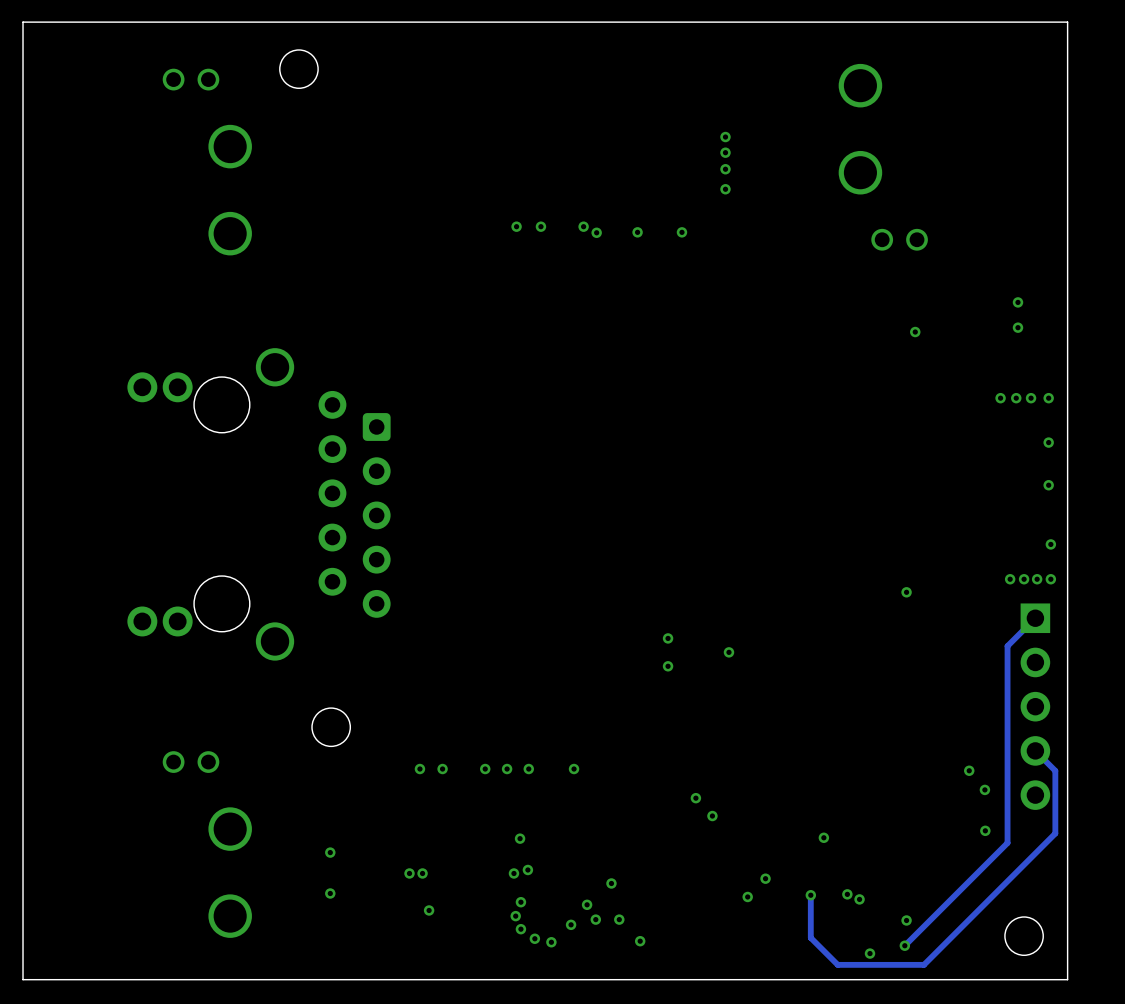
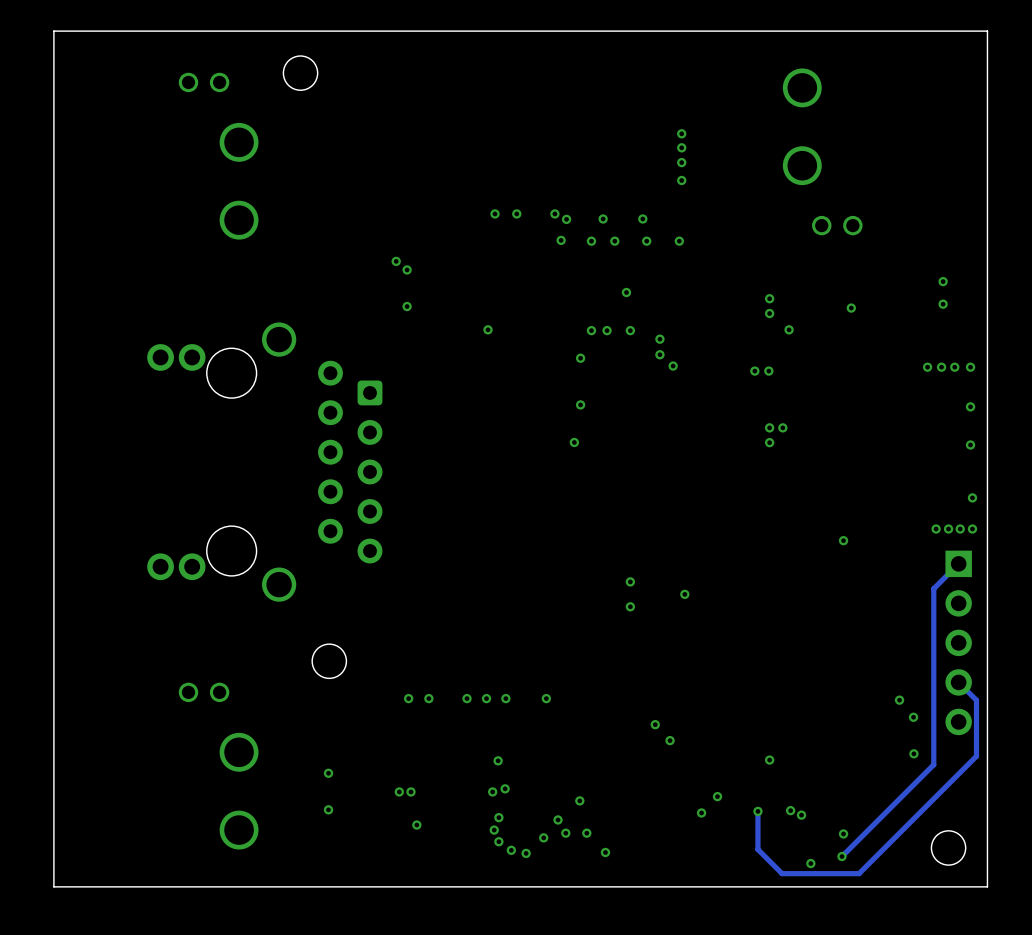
via: none -> (561, 240)
via: none -> (591, 241)
via: none -> (614, 241)
via: none -> (646, 241)
via: none -> (679, 241)
via: none -> (396, 261)
via: none -> (407, 269)
via: none -> (626, 292)
via: none -> (769, 298)
via: none -> (407, 306)
via: none -> (769, 313)
via: none -> (488, 329)
via: none -> (789, 329)
via: none -> (591, 330)
via: none -> (607, 330)
via: none -> (630, 330)
via: none -> (659, 339)
via: none -> (659, 354)
via: none -> (580, 358)
via: none -> (673, 366)
via: none -> (754, 371)
via: none -> (768, 371)
via: none -> (580, 404)
via: none -> (769, 427)
via: none -> (782, 427)
via: none -> (574, 442)
via: none -> (769, 442)

